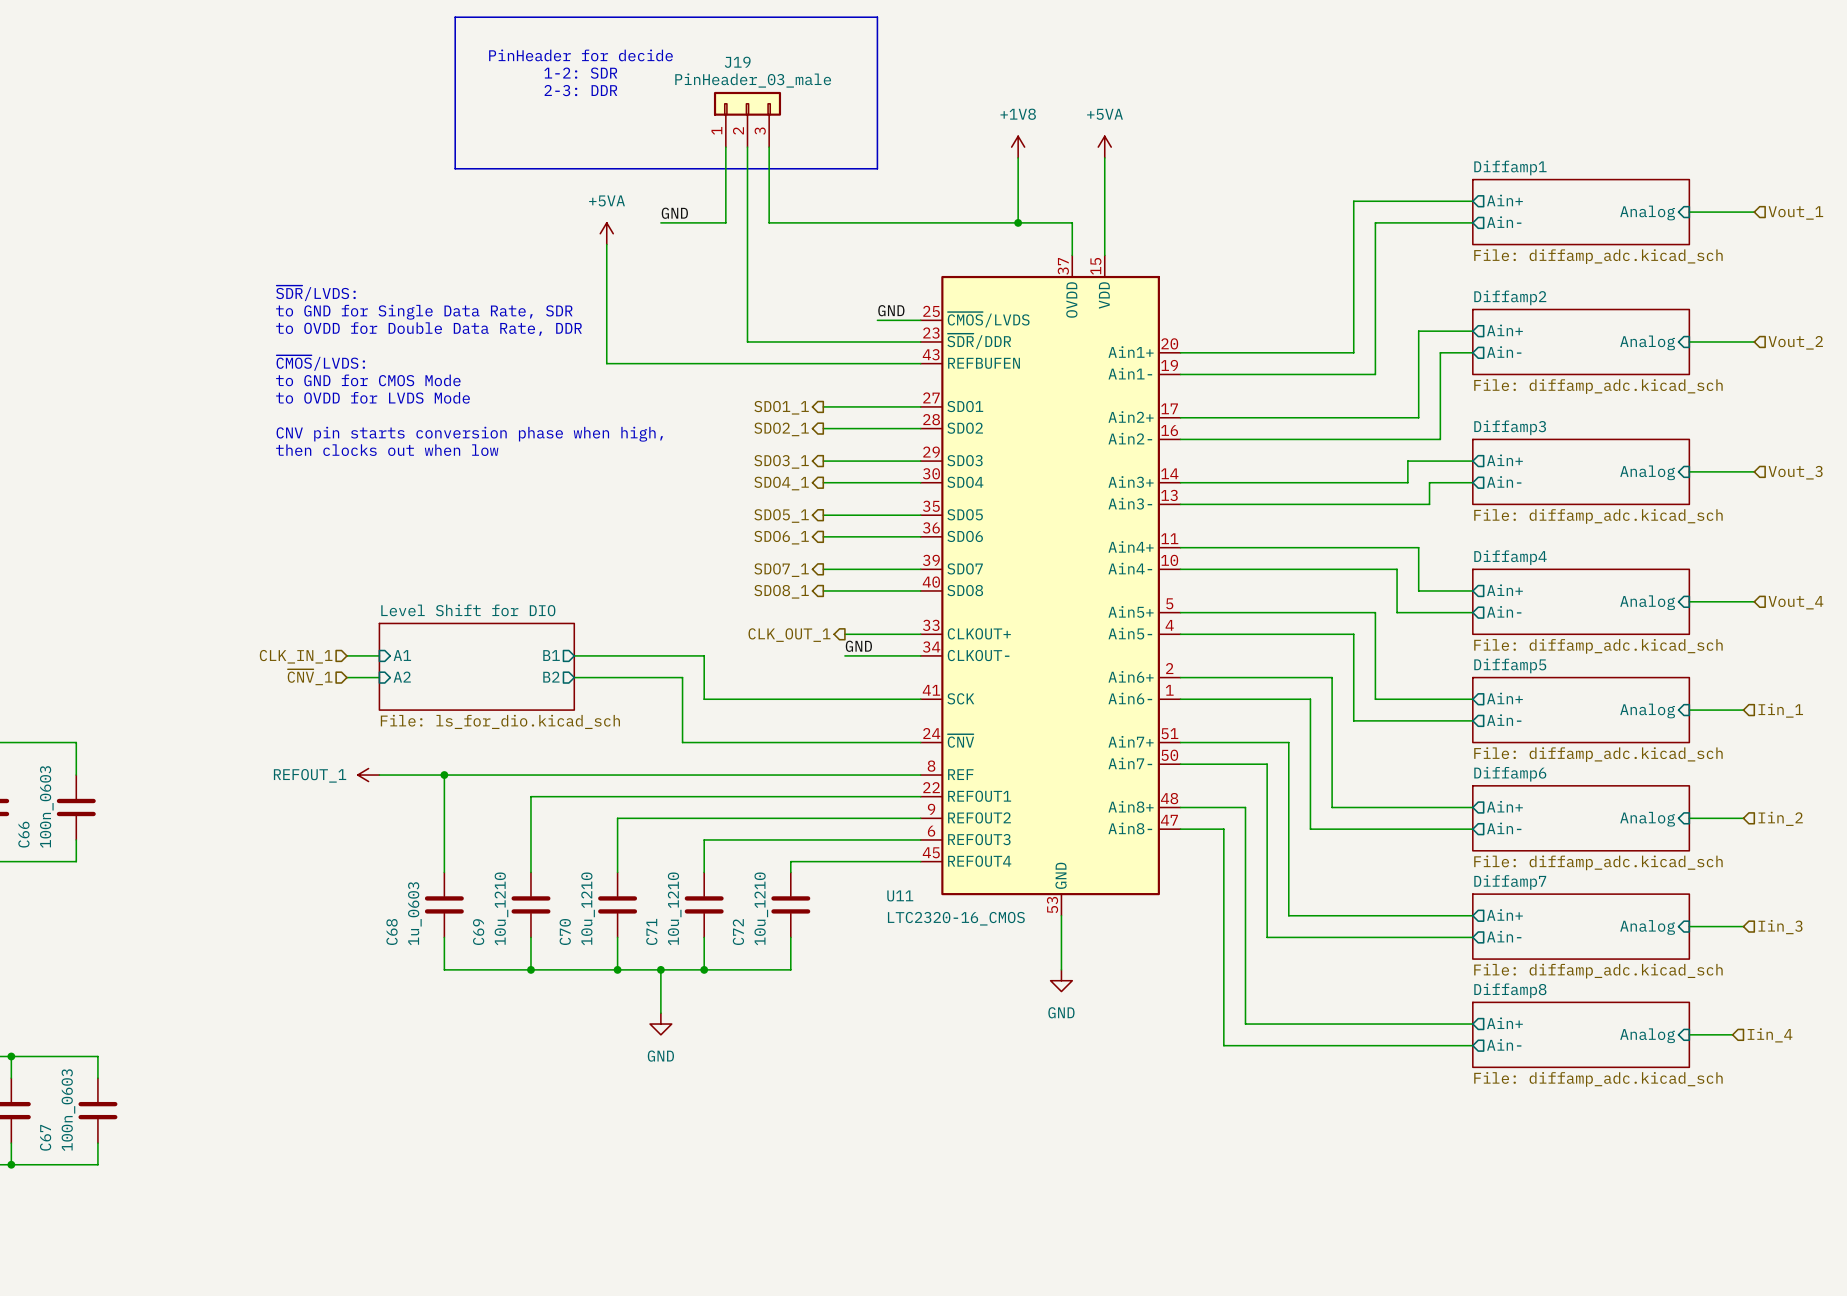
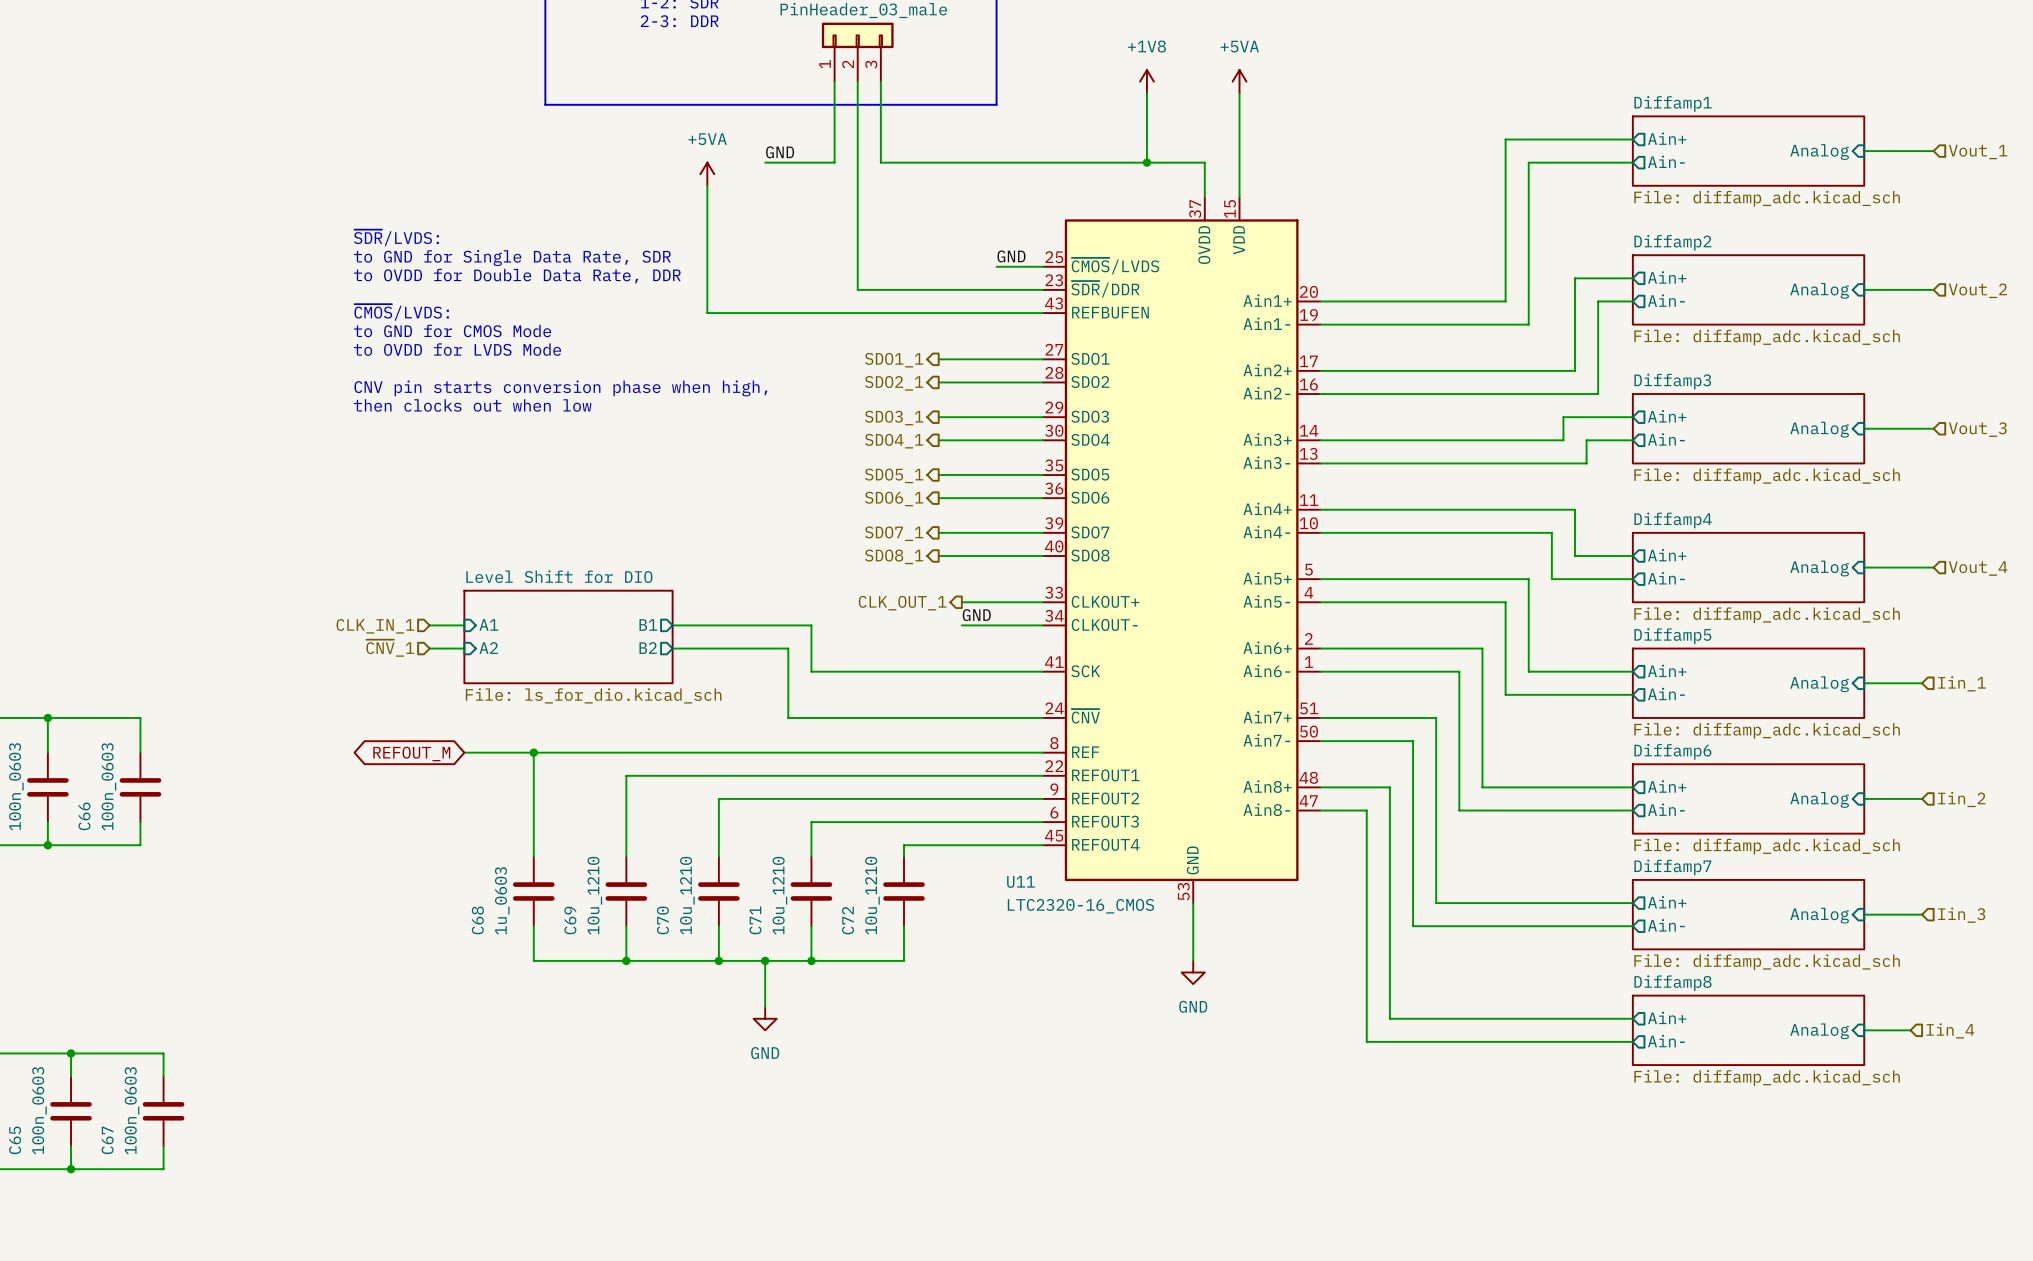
power symbol: REFOUT_1 (368, 775) -> none
global label: none -> REFOUT_M (411, 753)

